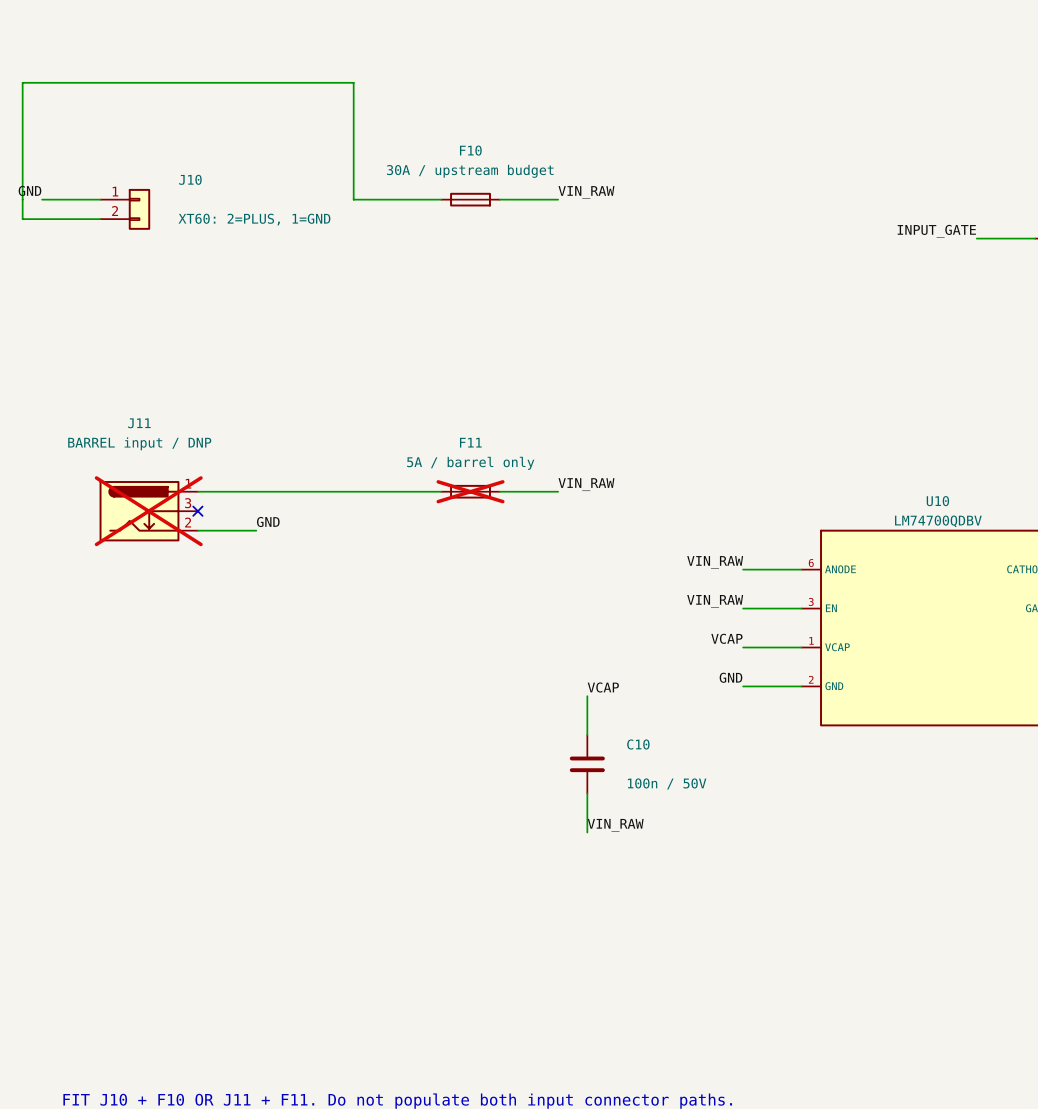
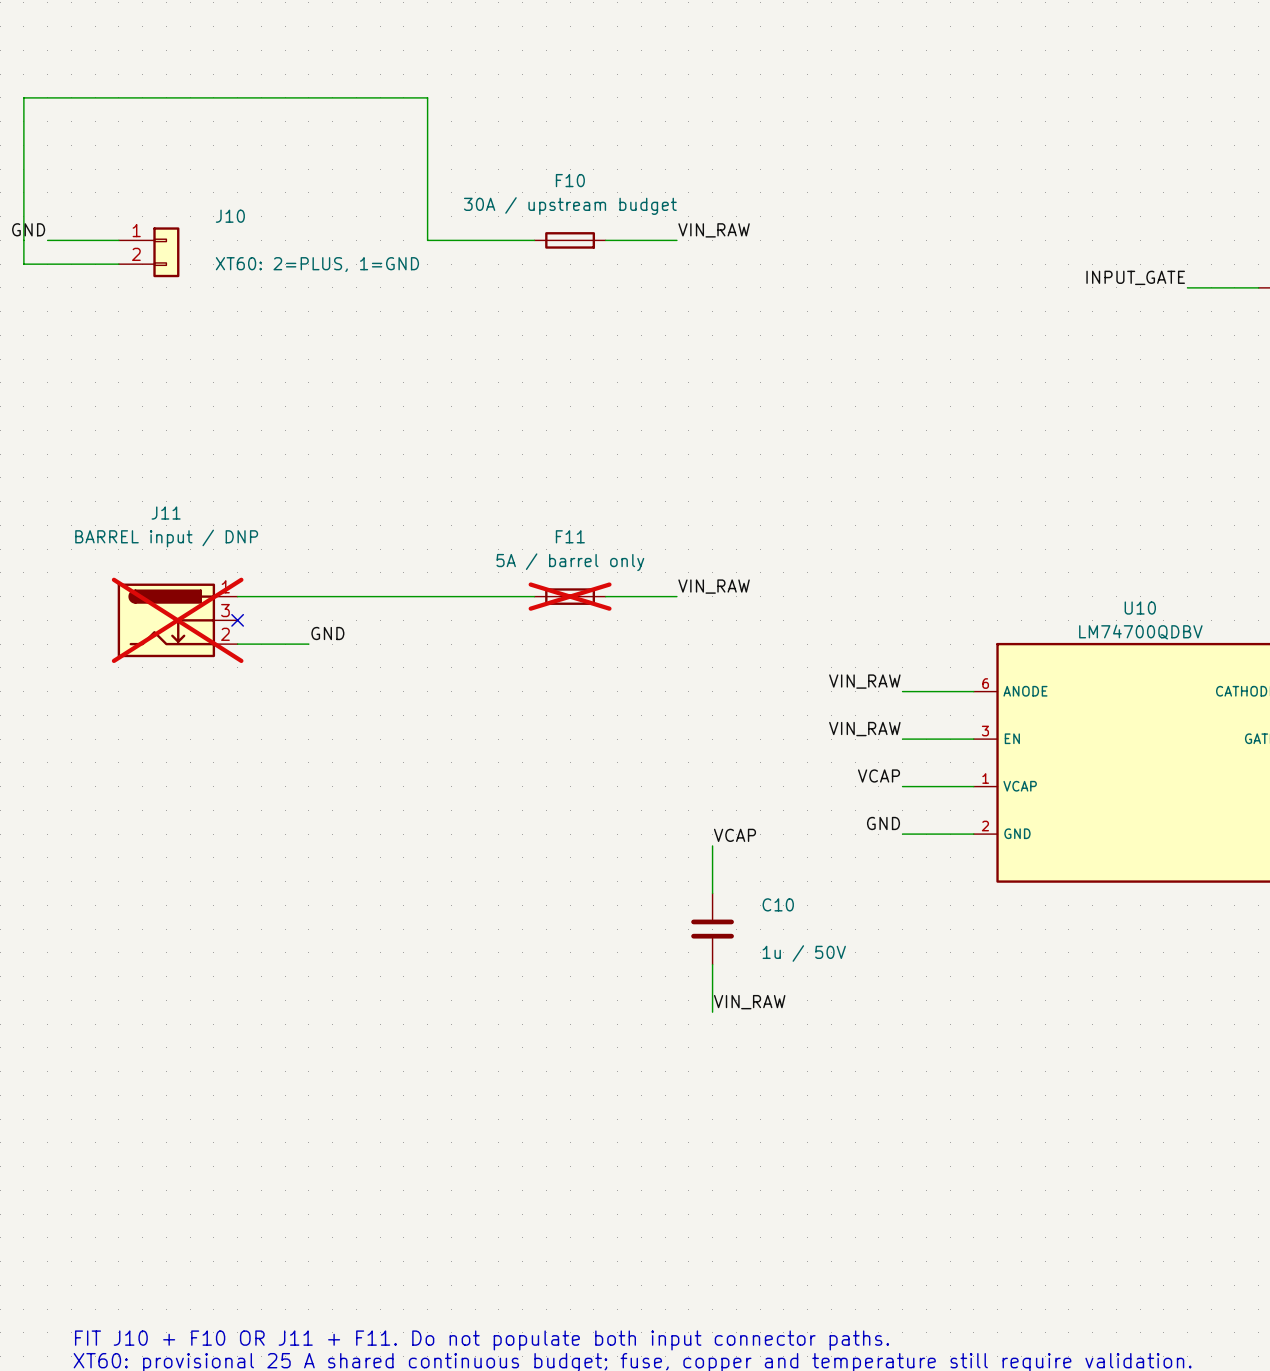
C10 value: 100n / 50V (667, 783) -> 1u / 50V (804, 953)

